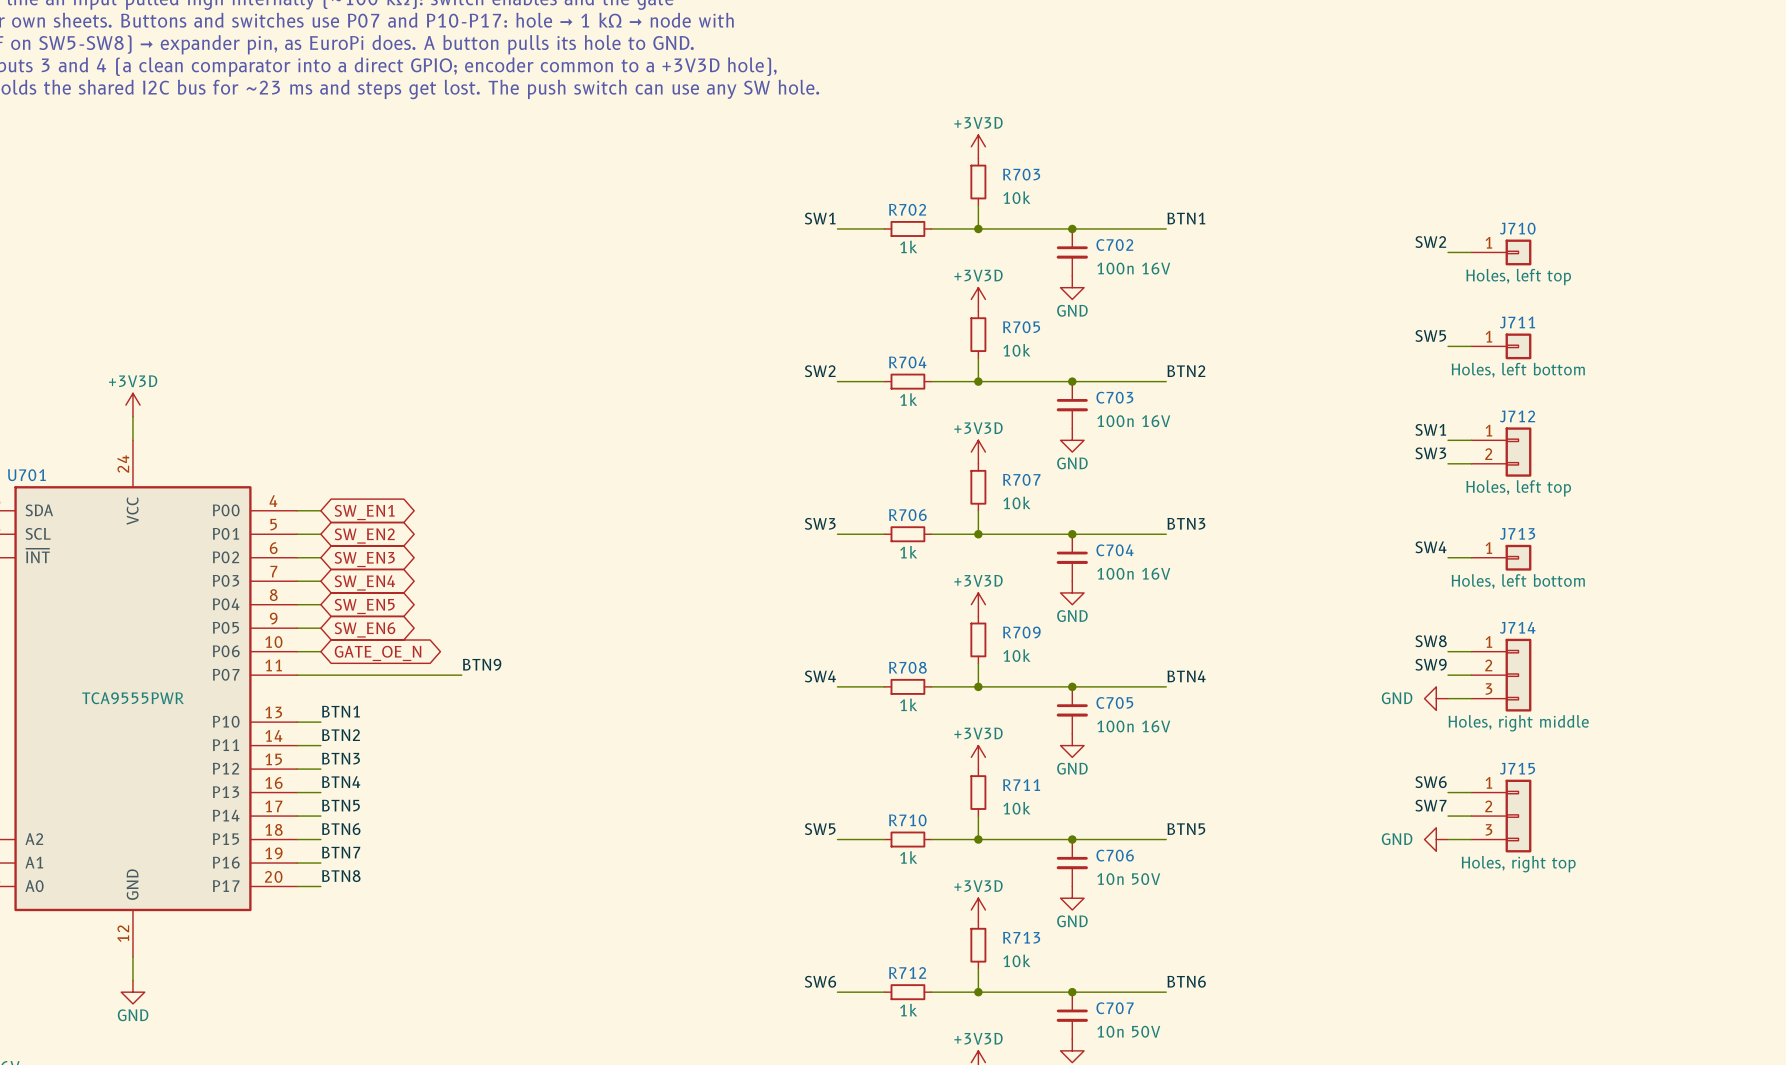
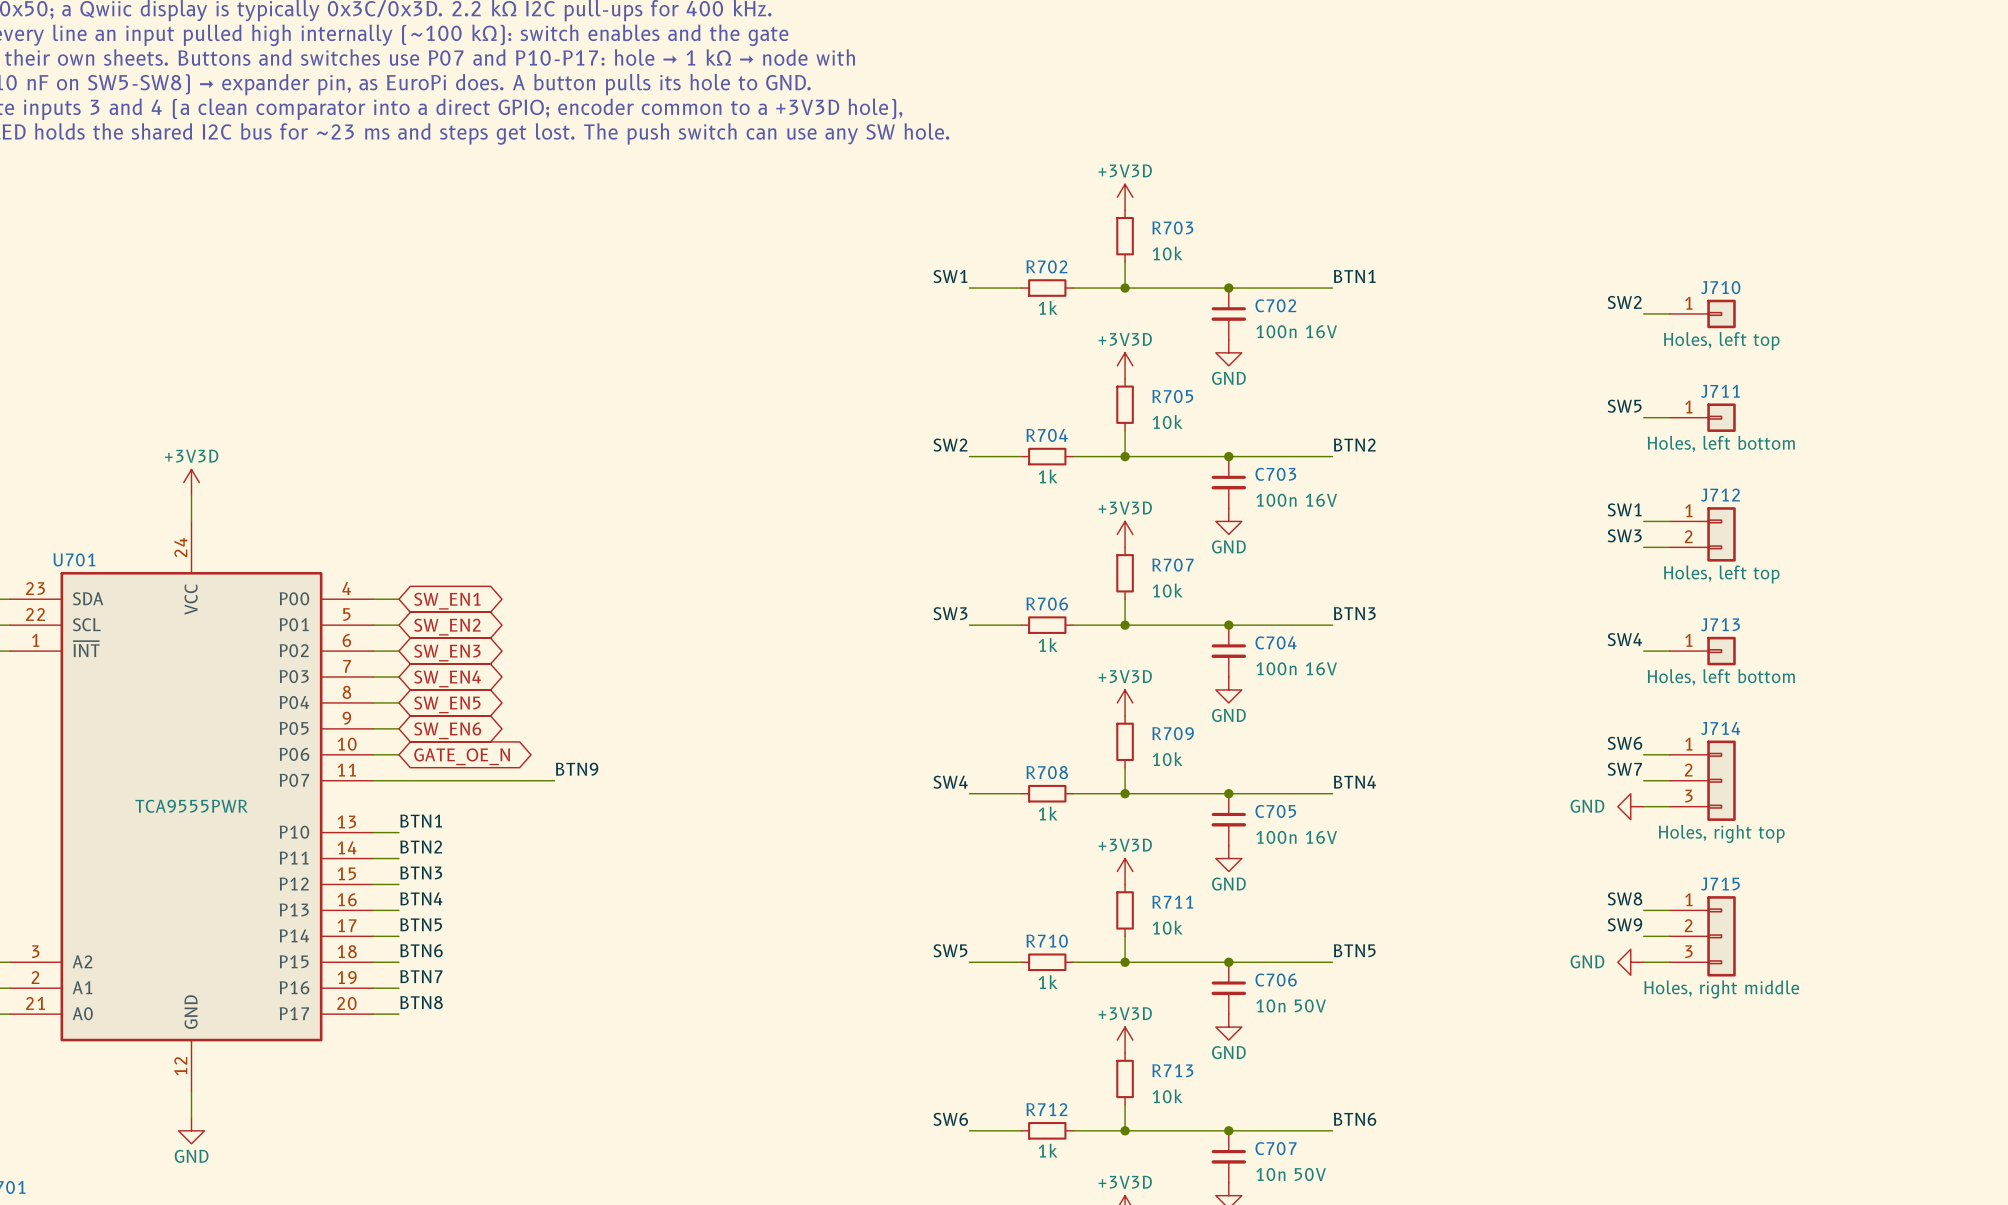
label: SW8 (1431, 641) -> SW6 (1624, 743)
label: SW9 (1431, 664) -> SW7 (1624, 769)
J714 value: Holes, right middle (1518, 723) -> Holes, right top (1721, 833)
label: SW6 (1431, 782) -> SW8 (1625, 898)
label: SW7 (1430, 805) -> SW9 (1624, 924)
J715 value: Holes, right top (1518, 864) -> Holes, right middle (1721, 989)

